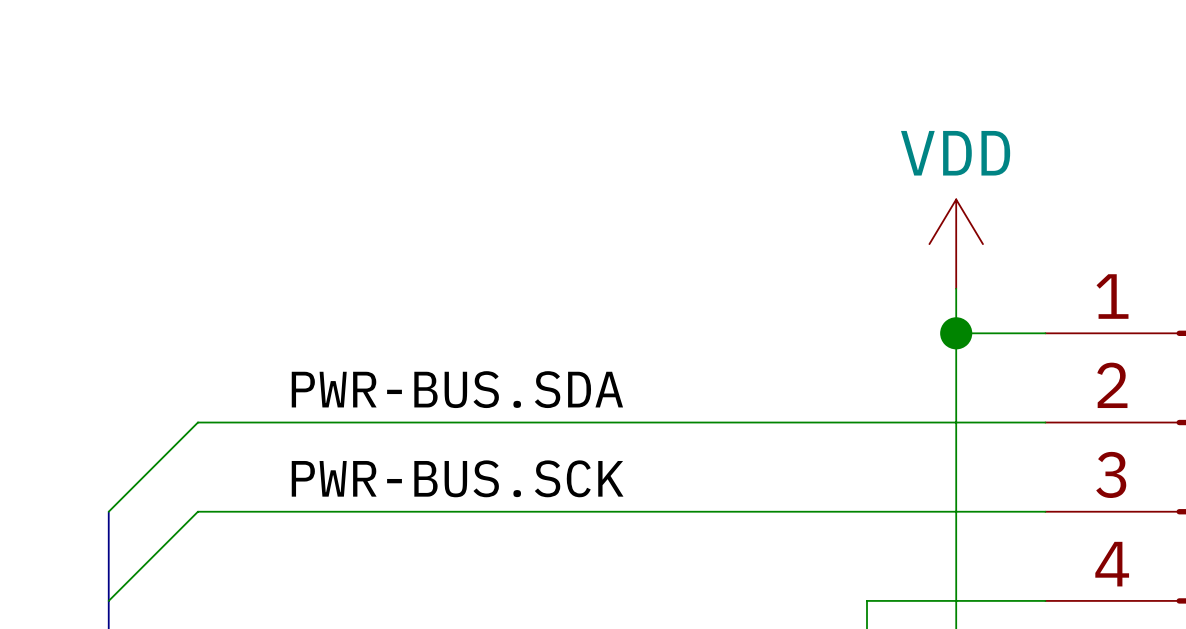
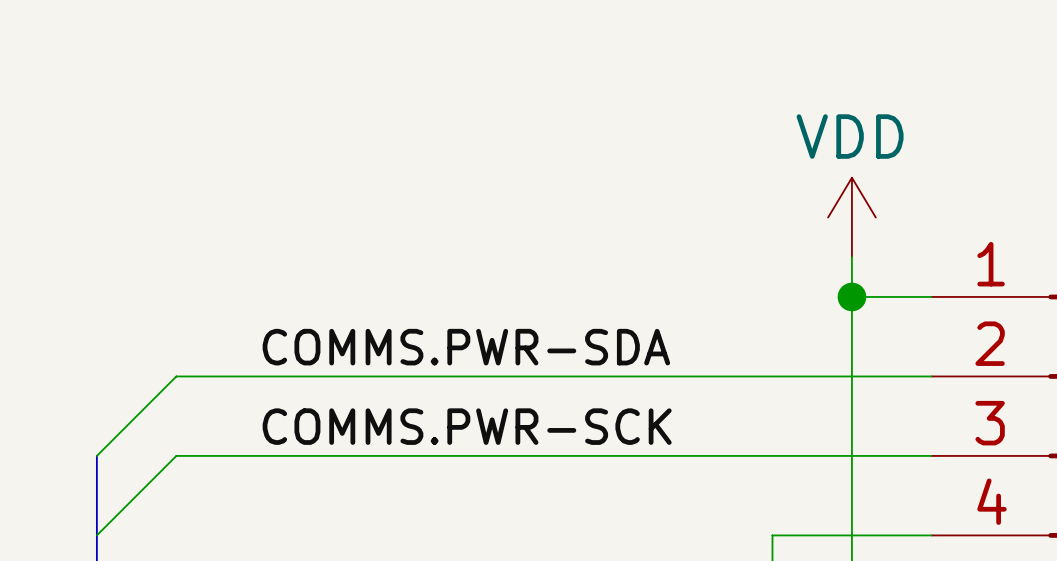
label: PWR-BUS.SDA (457, 389) -> COMMS.PWR-SDA (466, 347)
label: PWR-BUS.SCK (457, 478) -> COMMS.PWR-SCK (467, 426)

